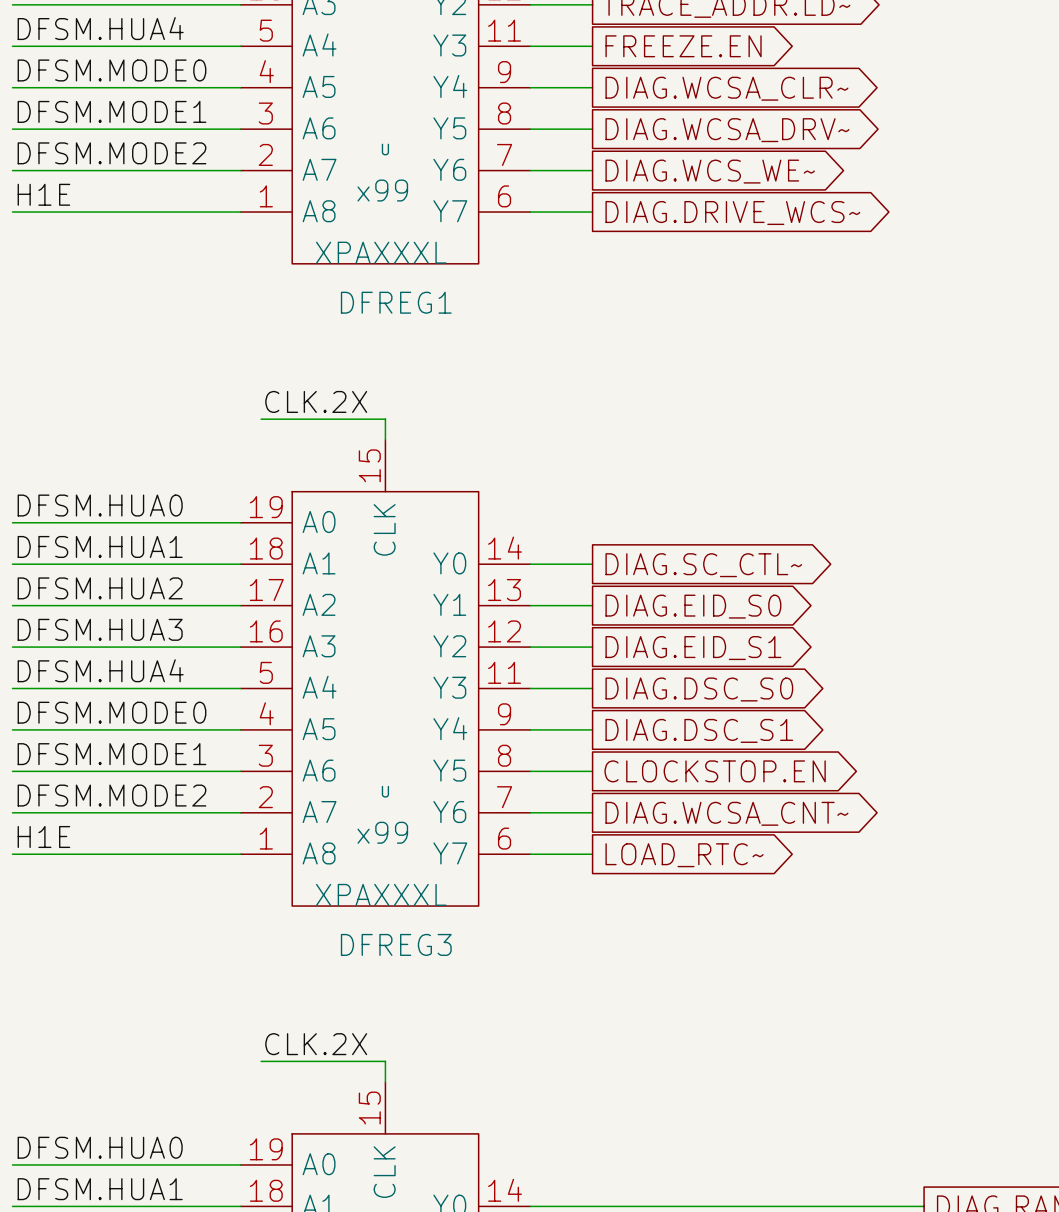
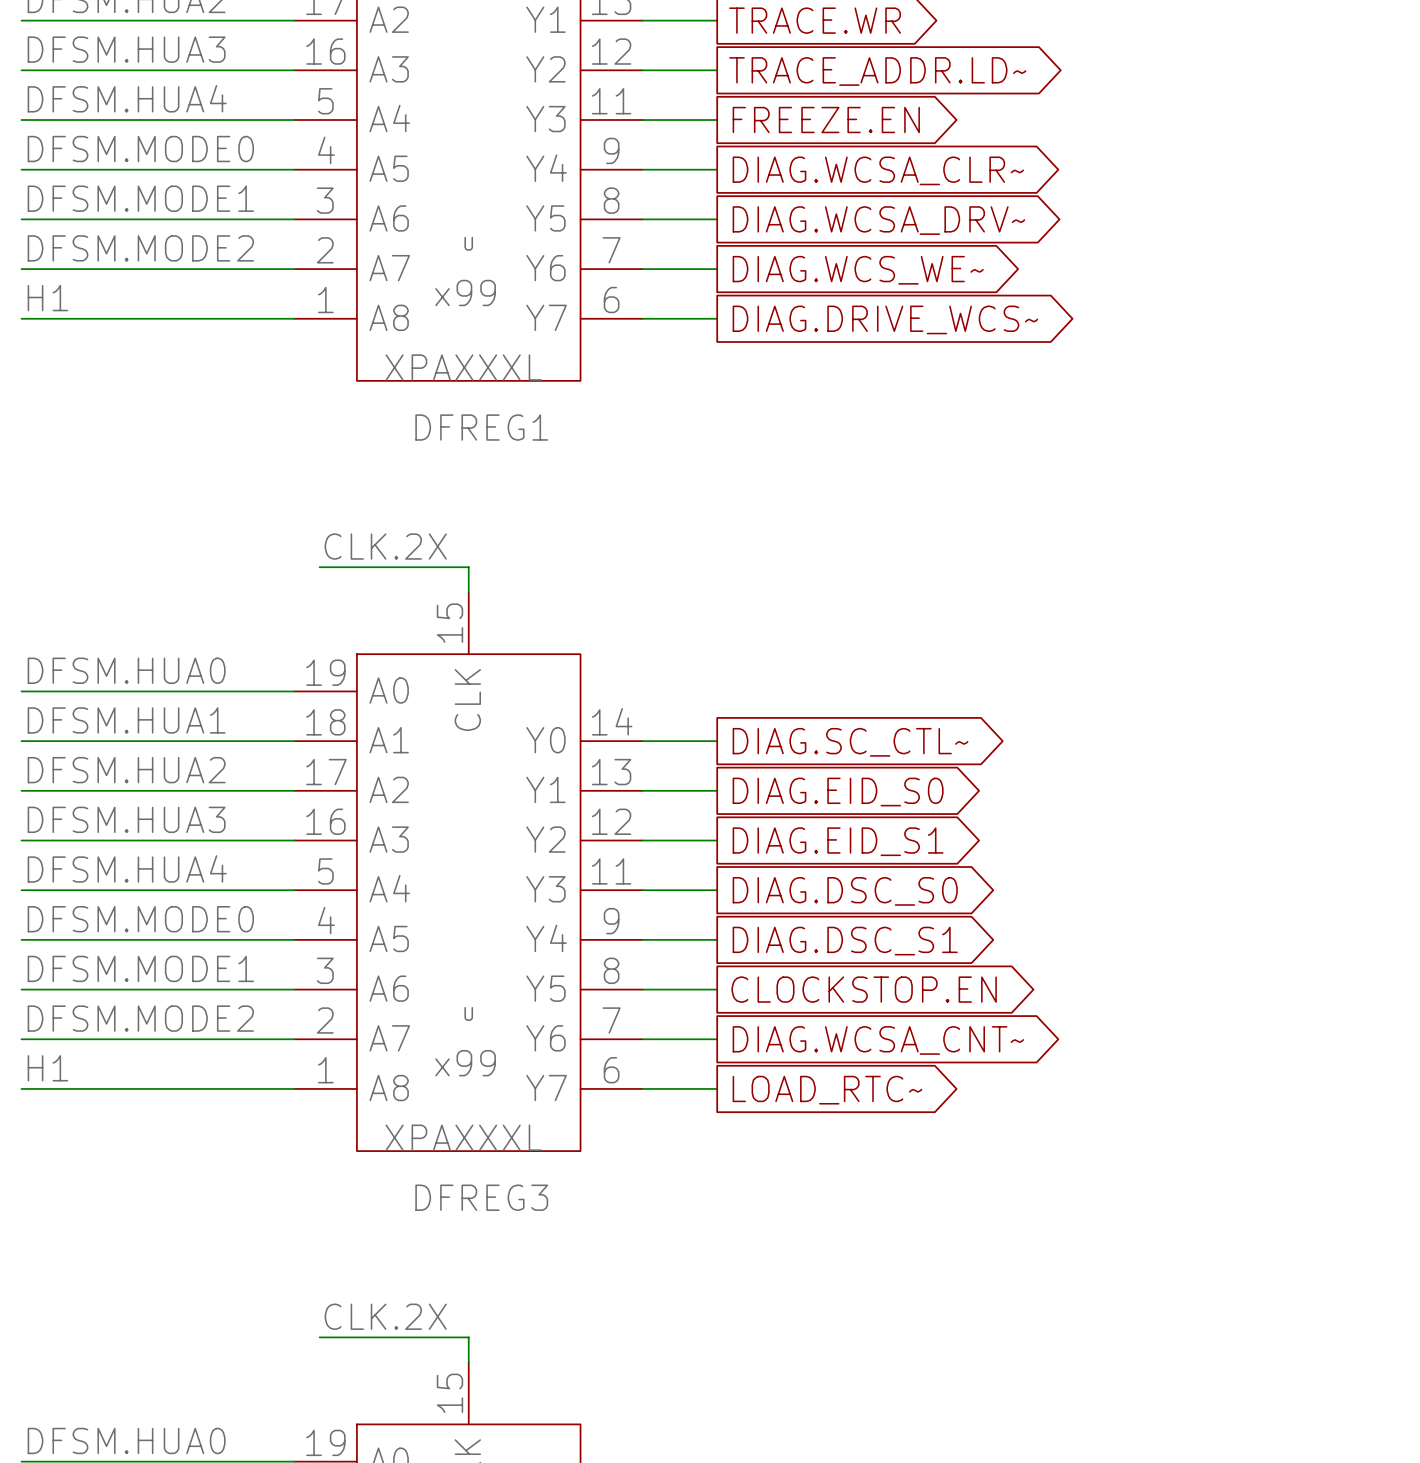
label: H1E (43, 194) -> H1 (47, 298)
label: H1E (43, 836) -> H1 (47, 1068)

